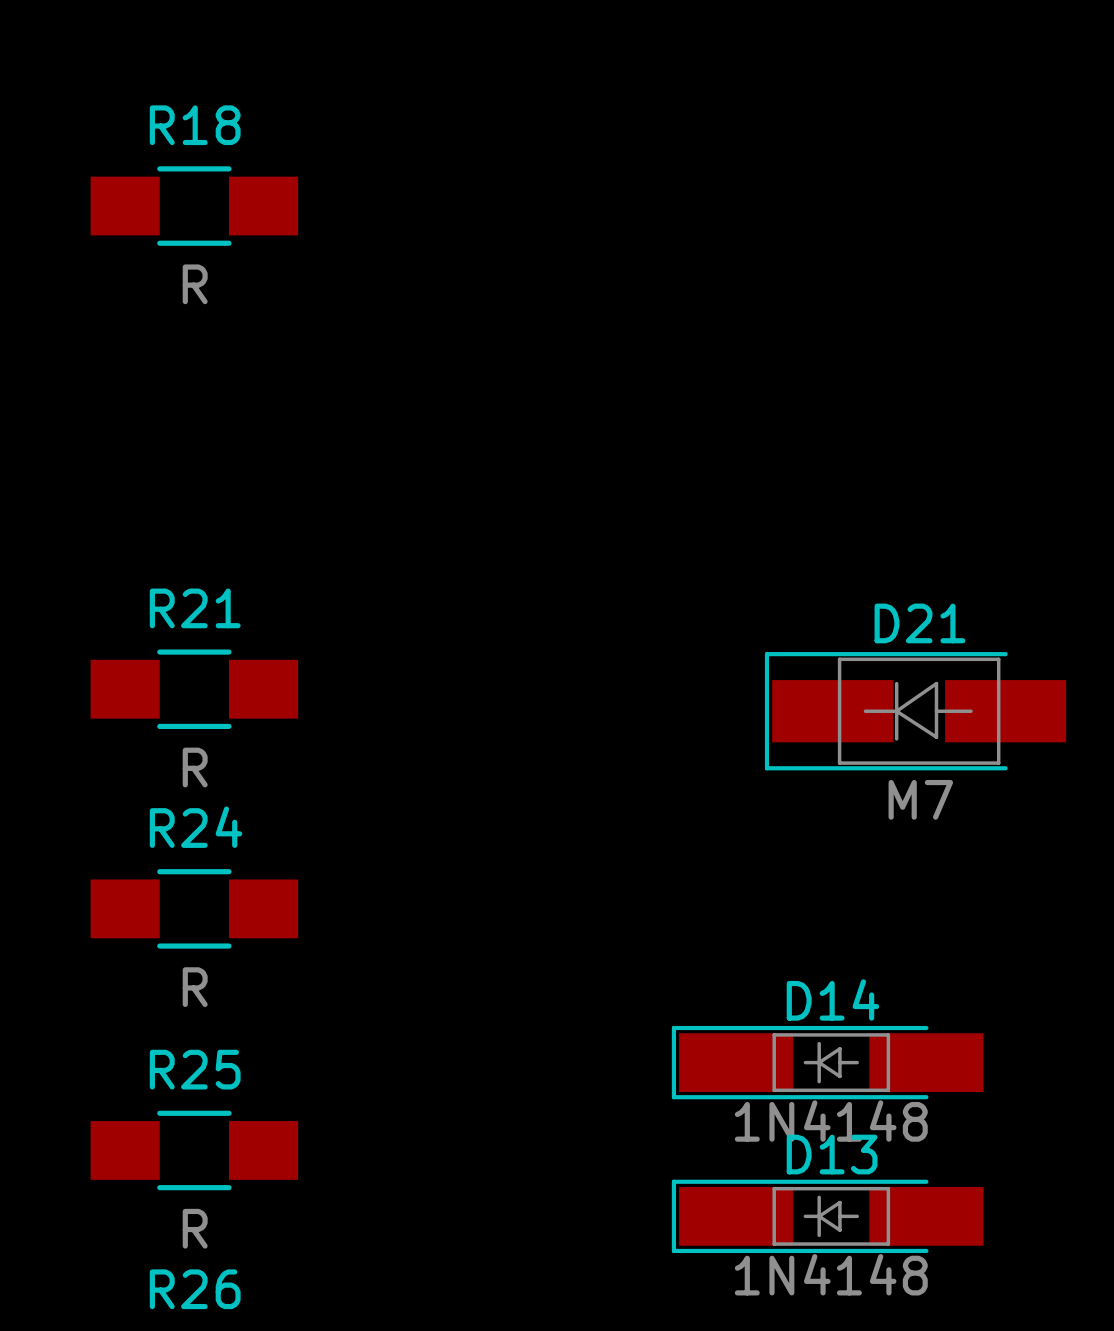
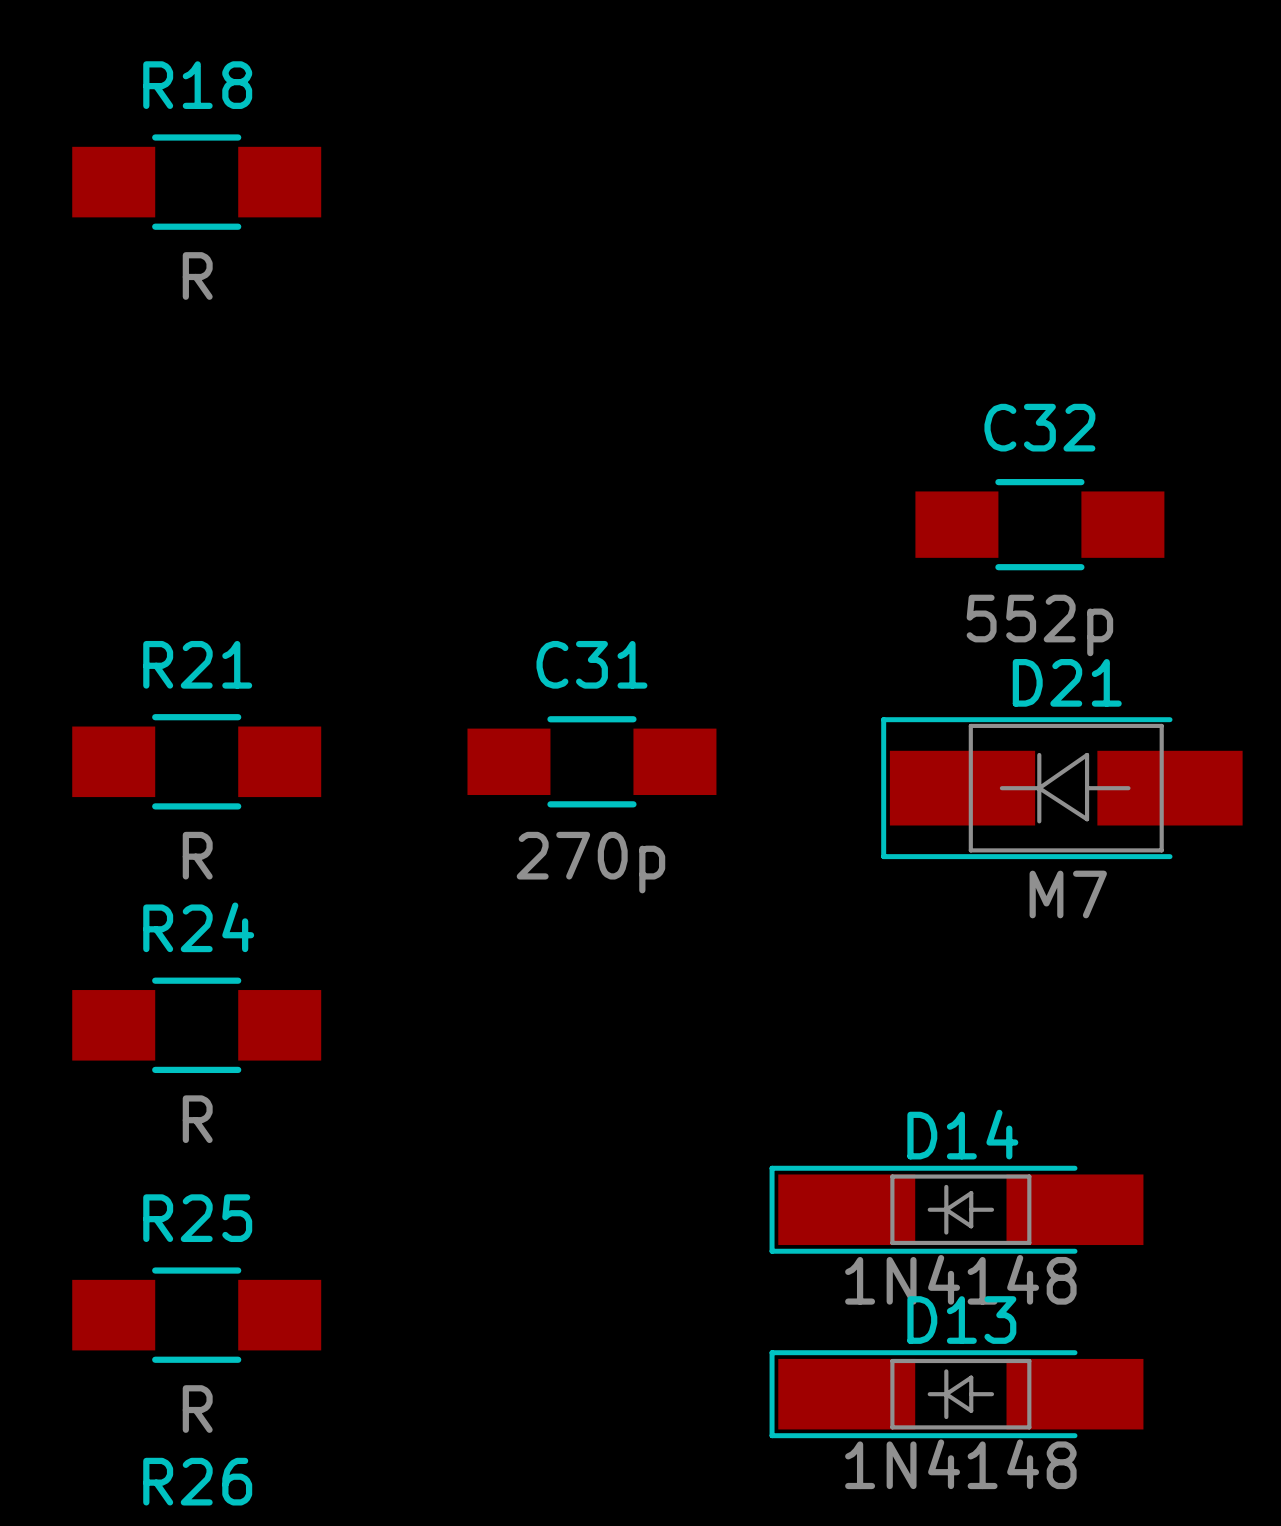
C32: none -> 552p (1039, 524)
C31: none -> 270p (591, 761)

